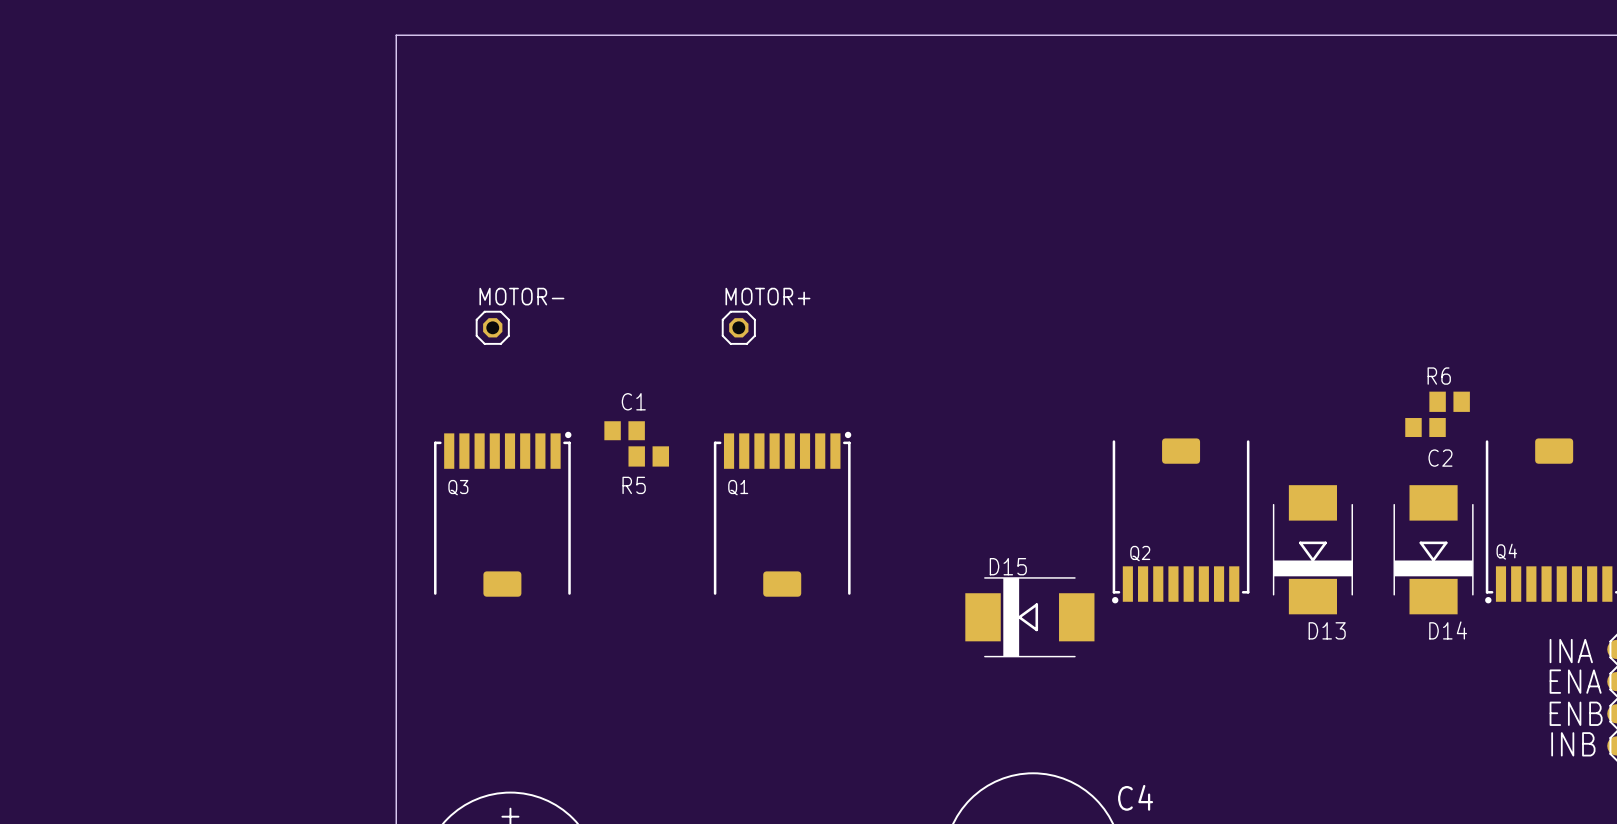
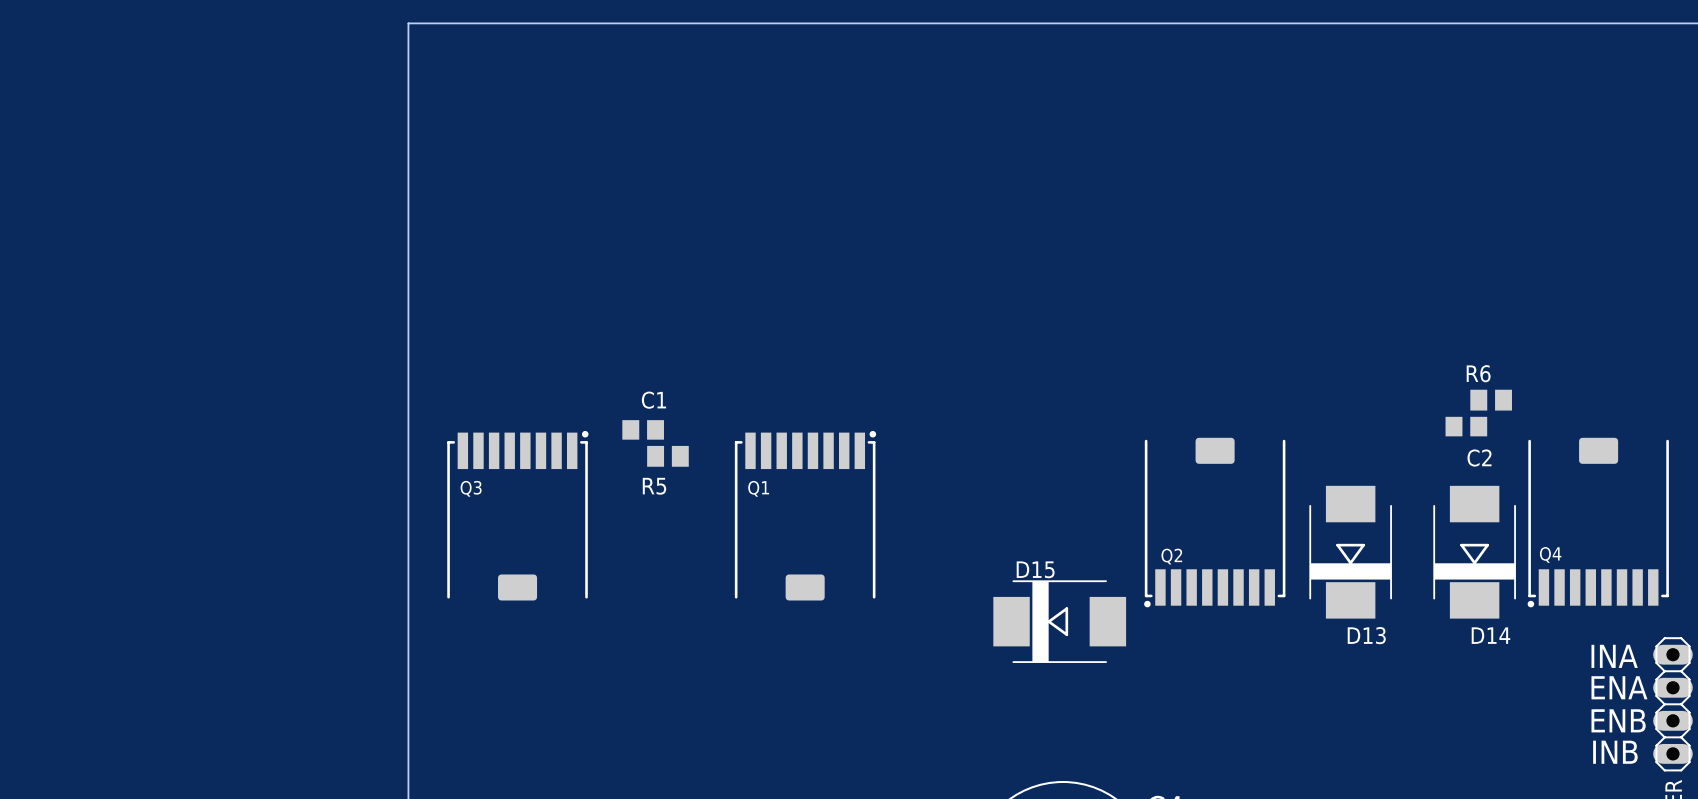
MOTOR-: (492, 327) -> none
MOTOR+: (738, 327) -> none

